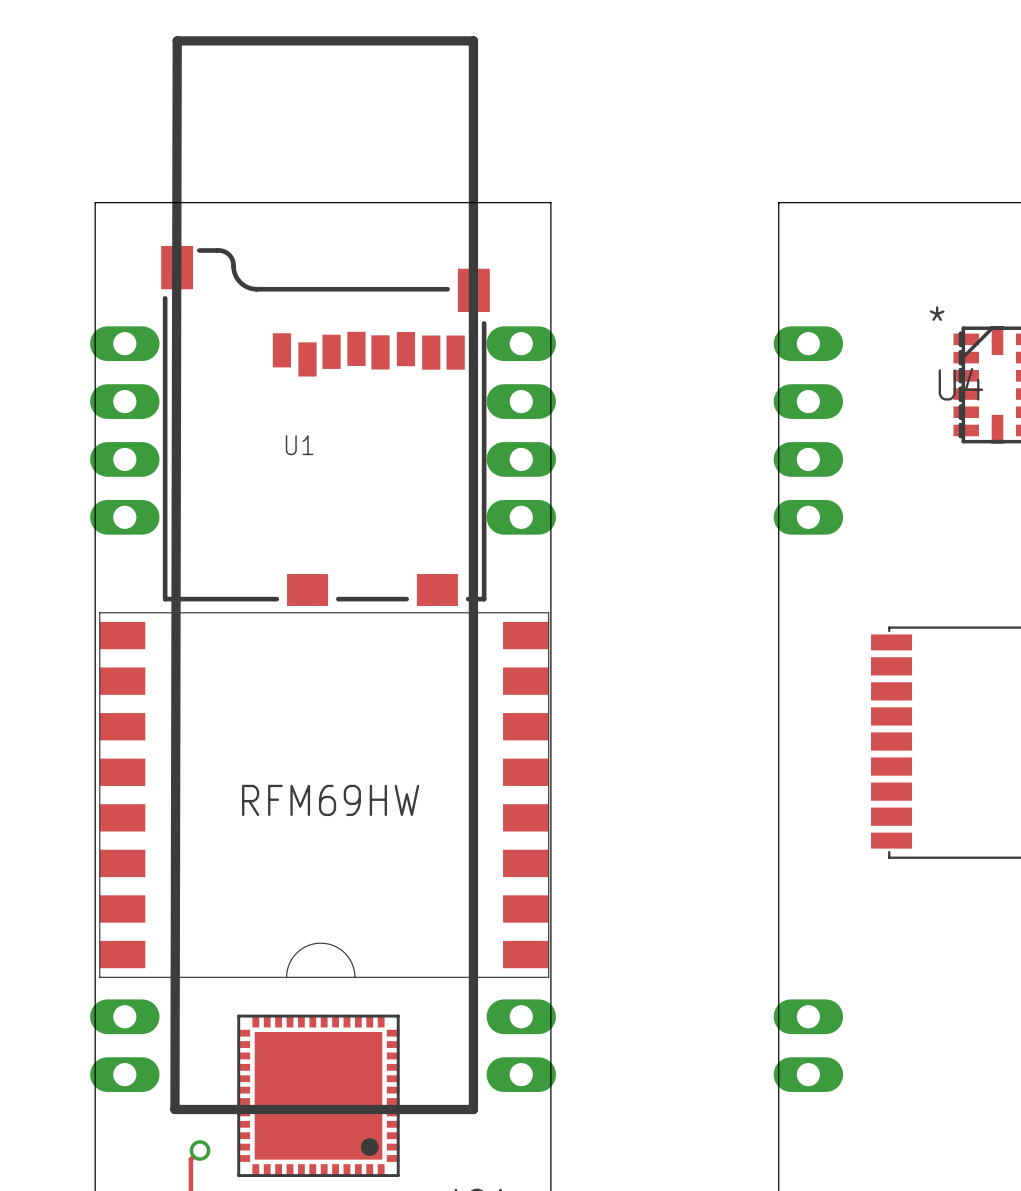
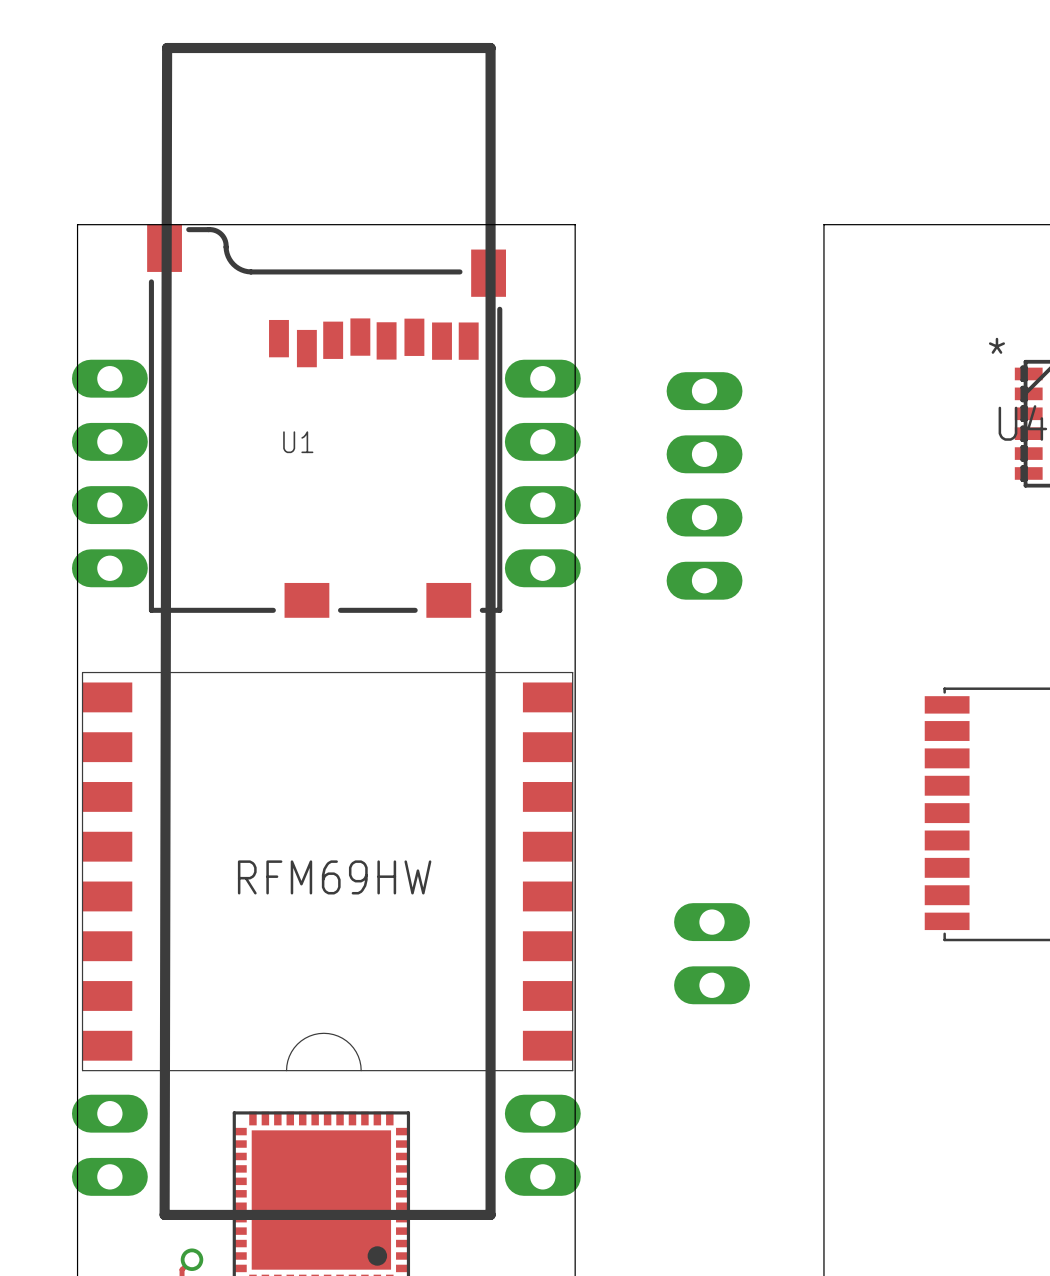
U1 position: (325, 425) -> (326, 421)
part position: (808, 430) -> (704, 485)
part position: (808, 1045) -> (712, 953)

